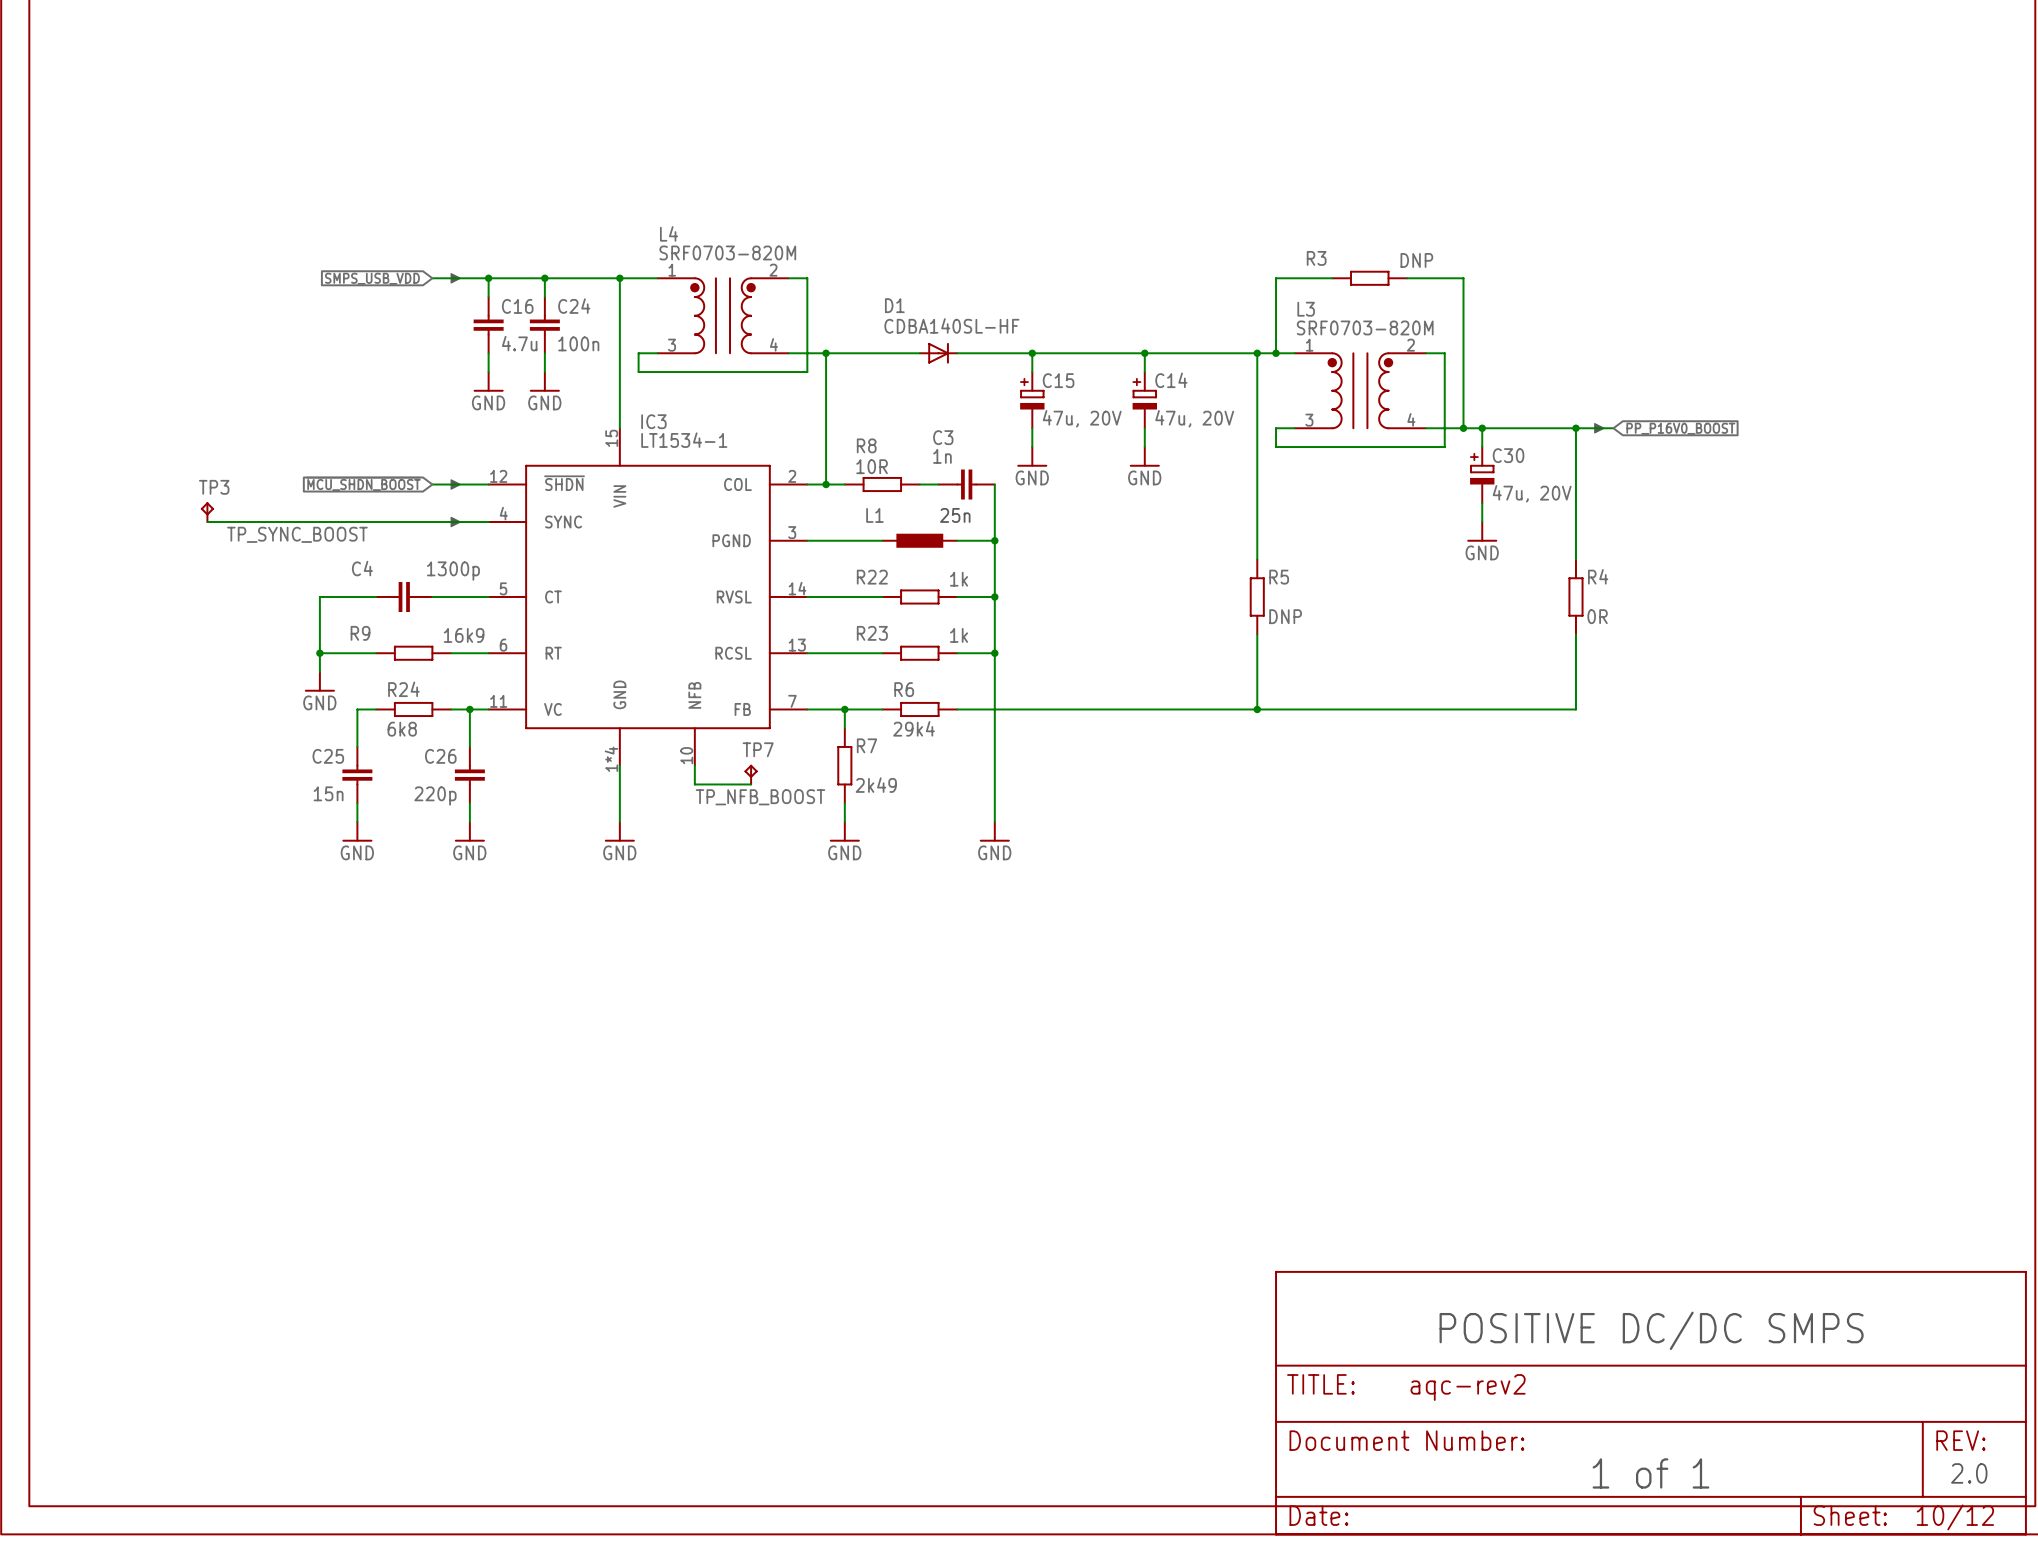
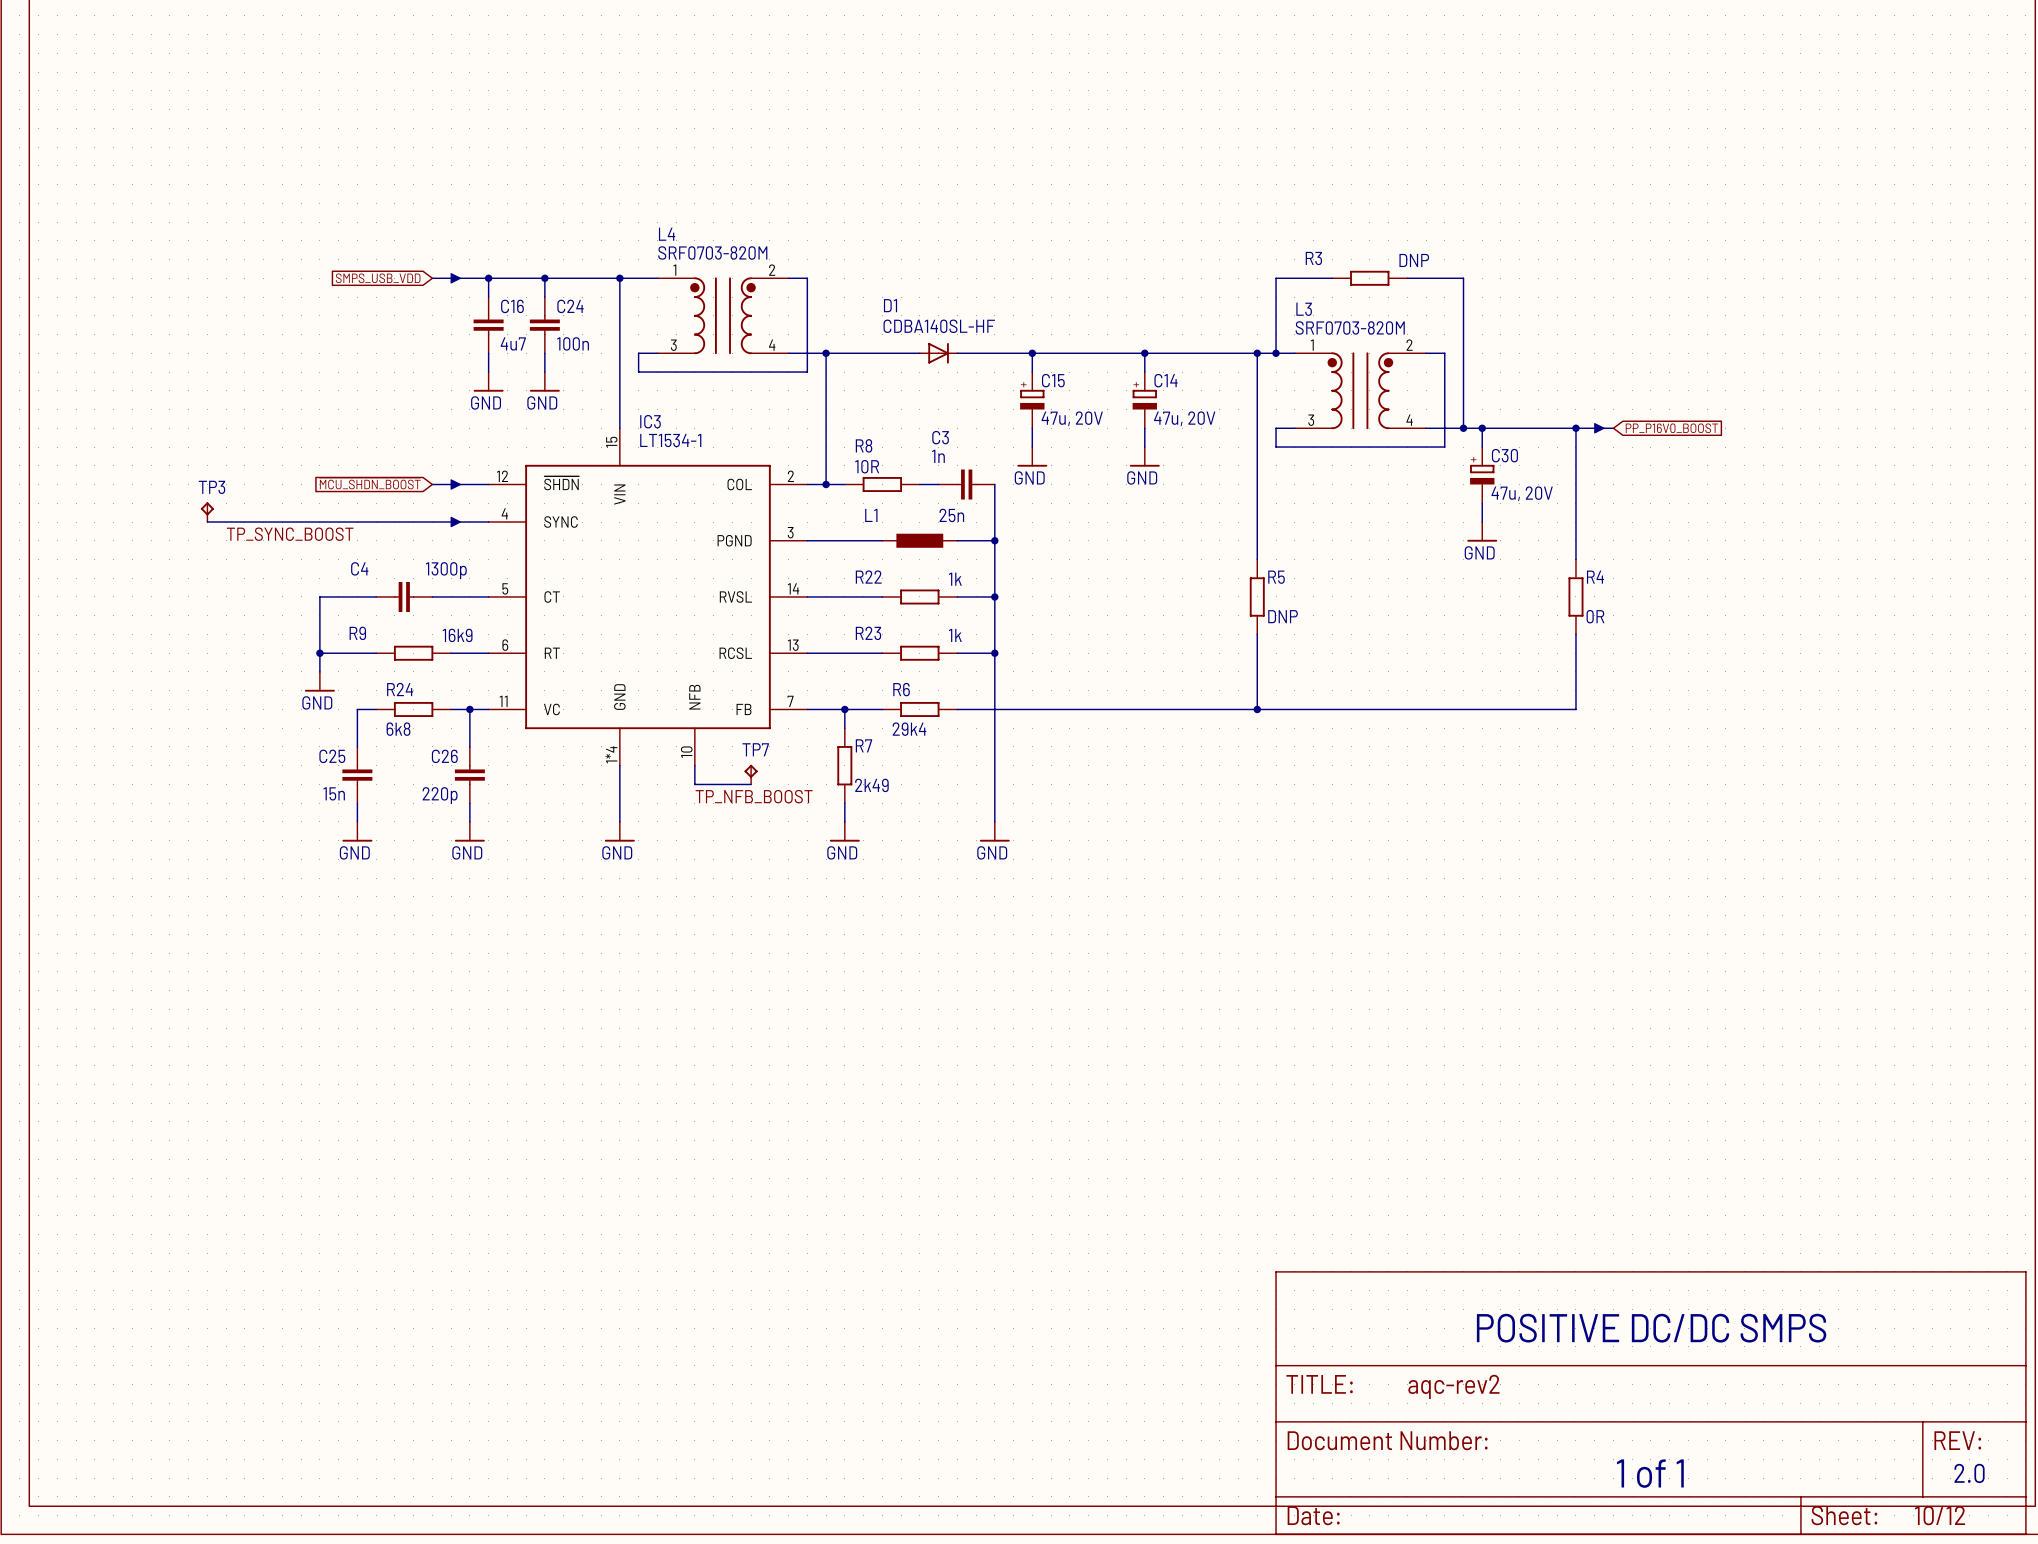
C16 value: 4.7u (519, 343) -> 4u7 (513, 343)

